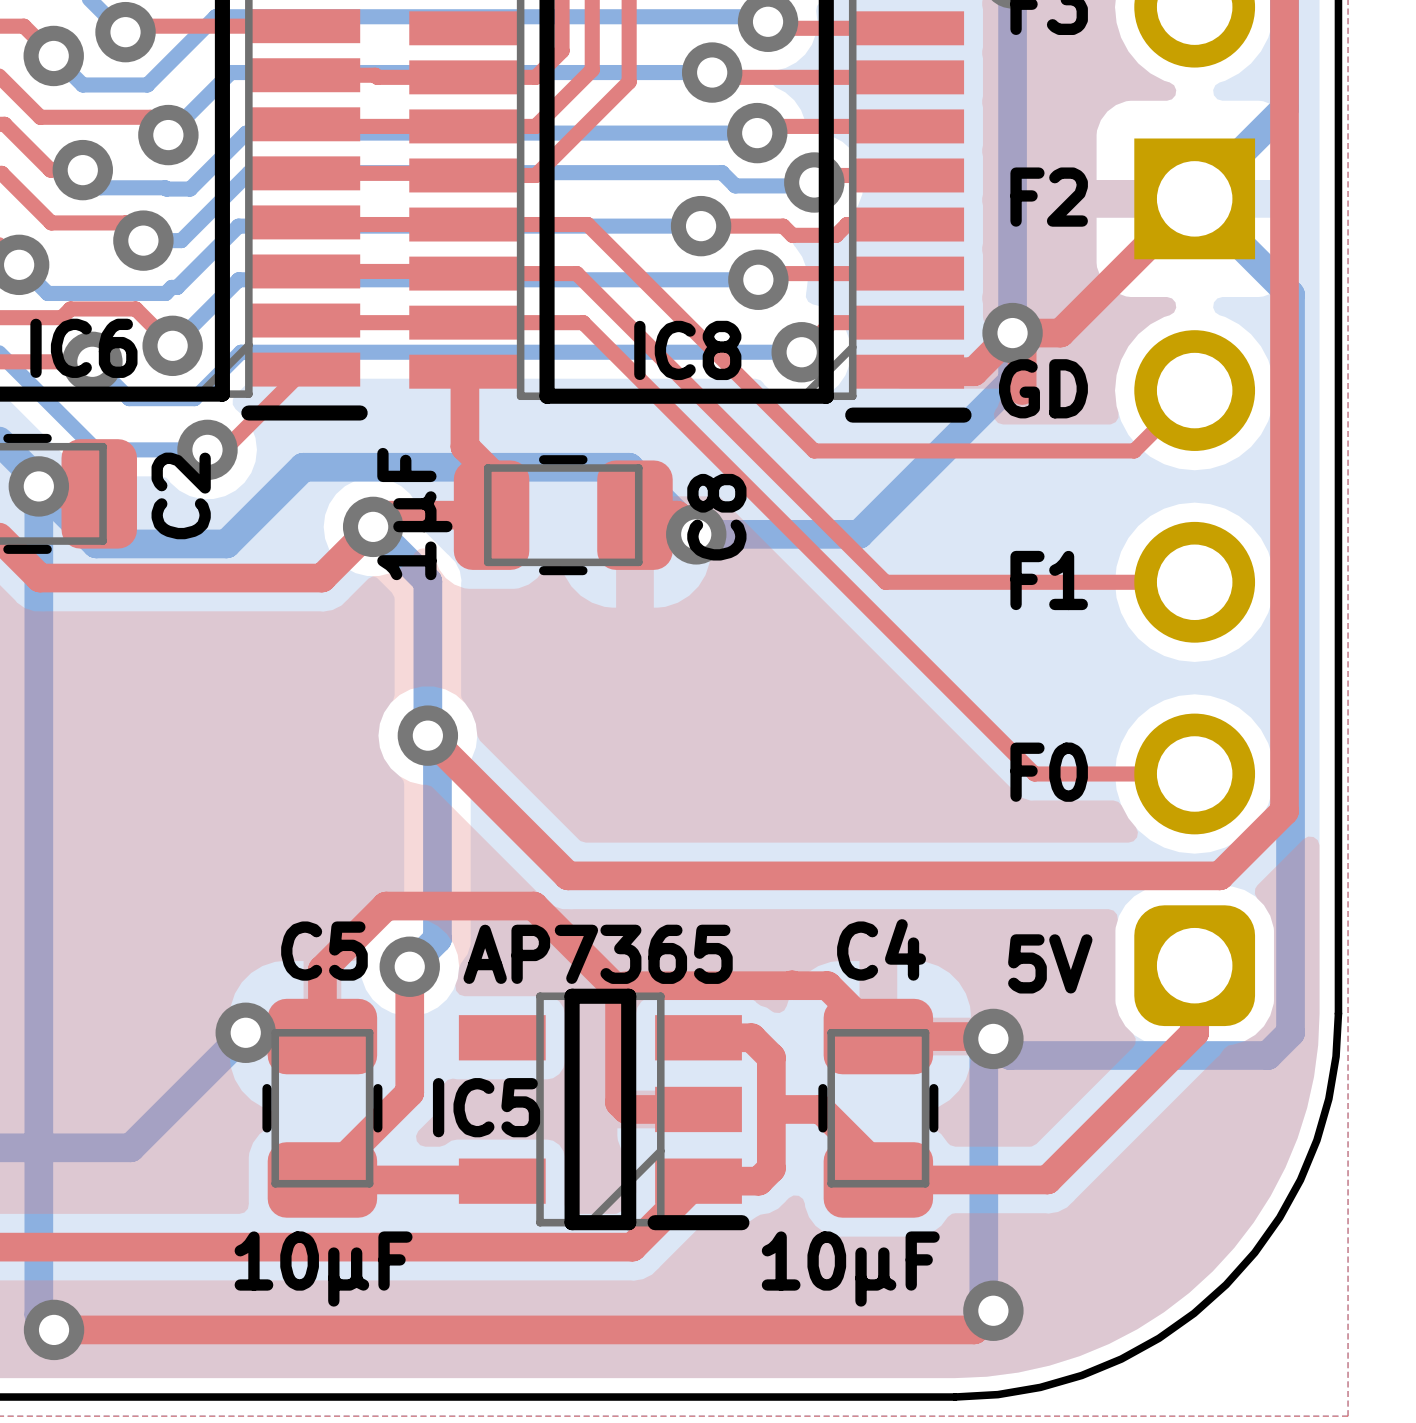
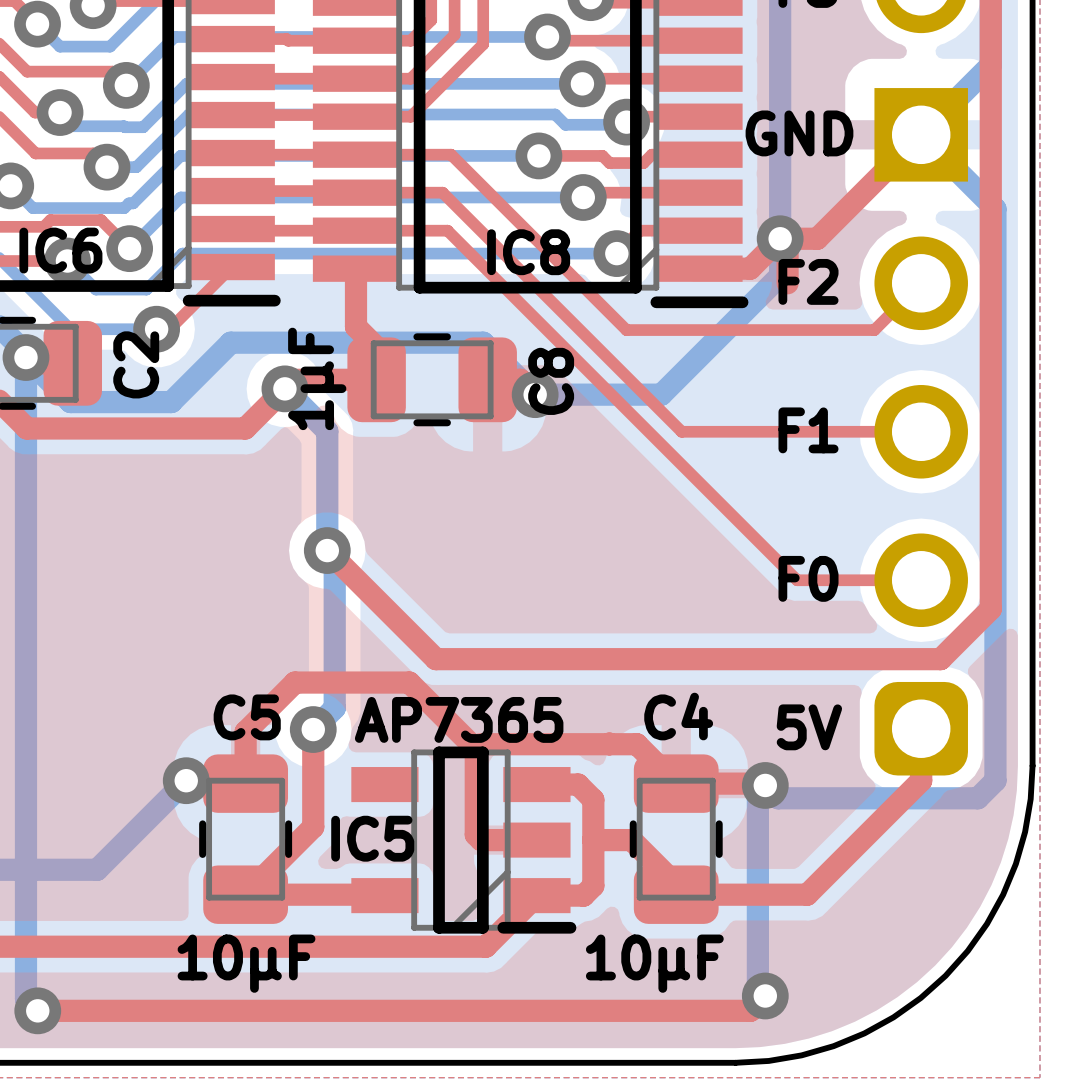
text: F2 (1049, 197) -> GND (799, 133)
text: GD (1043, 388) -> F2 (808, 281)

